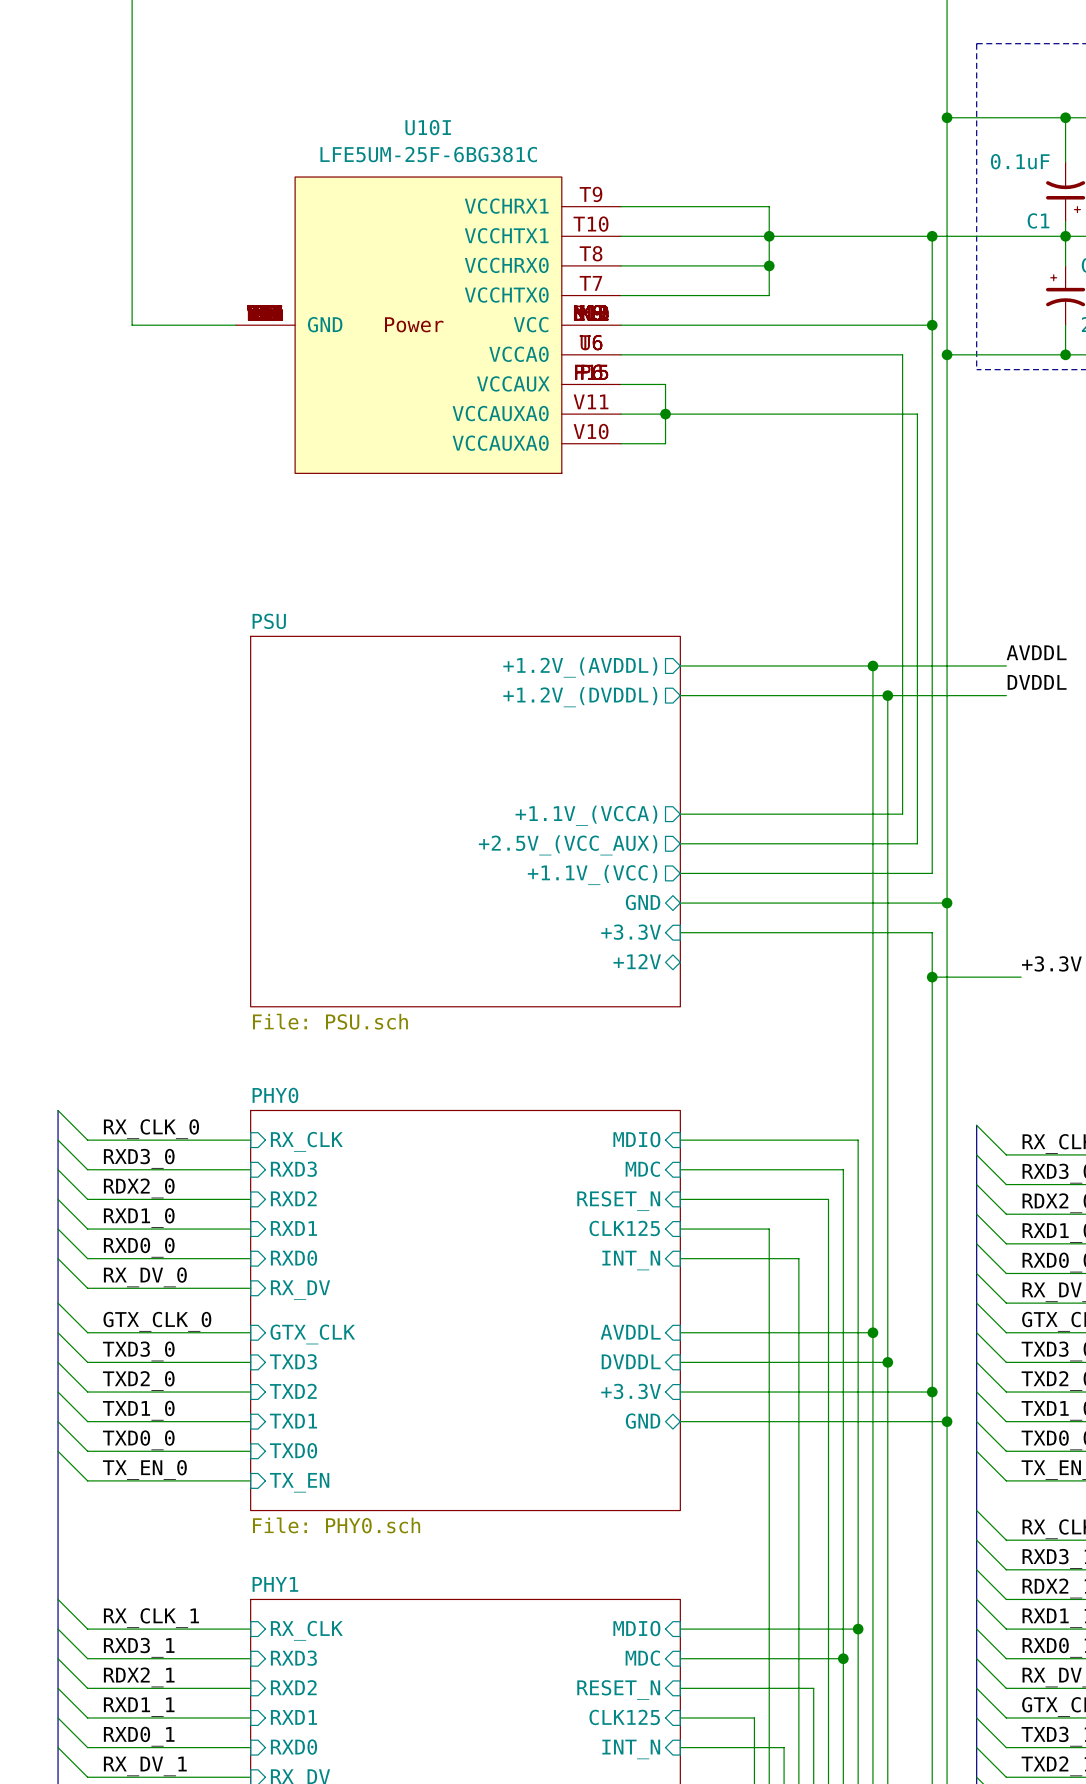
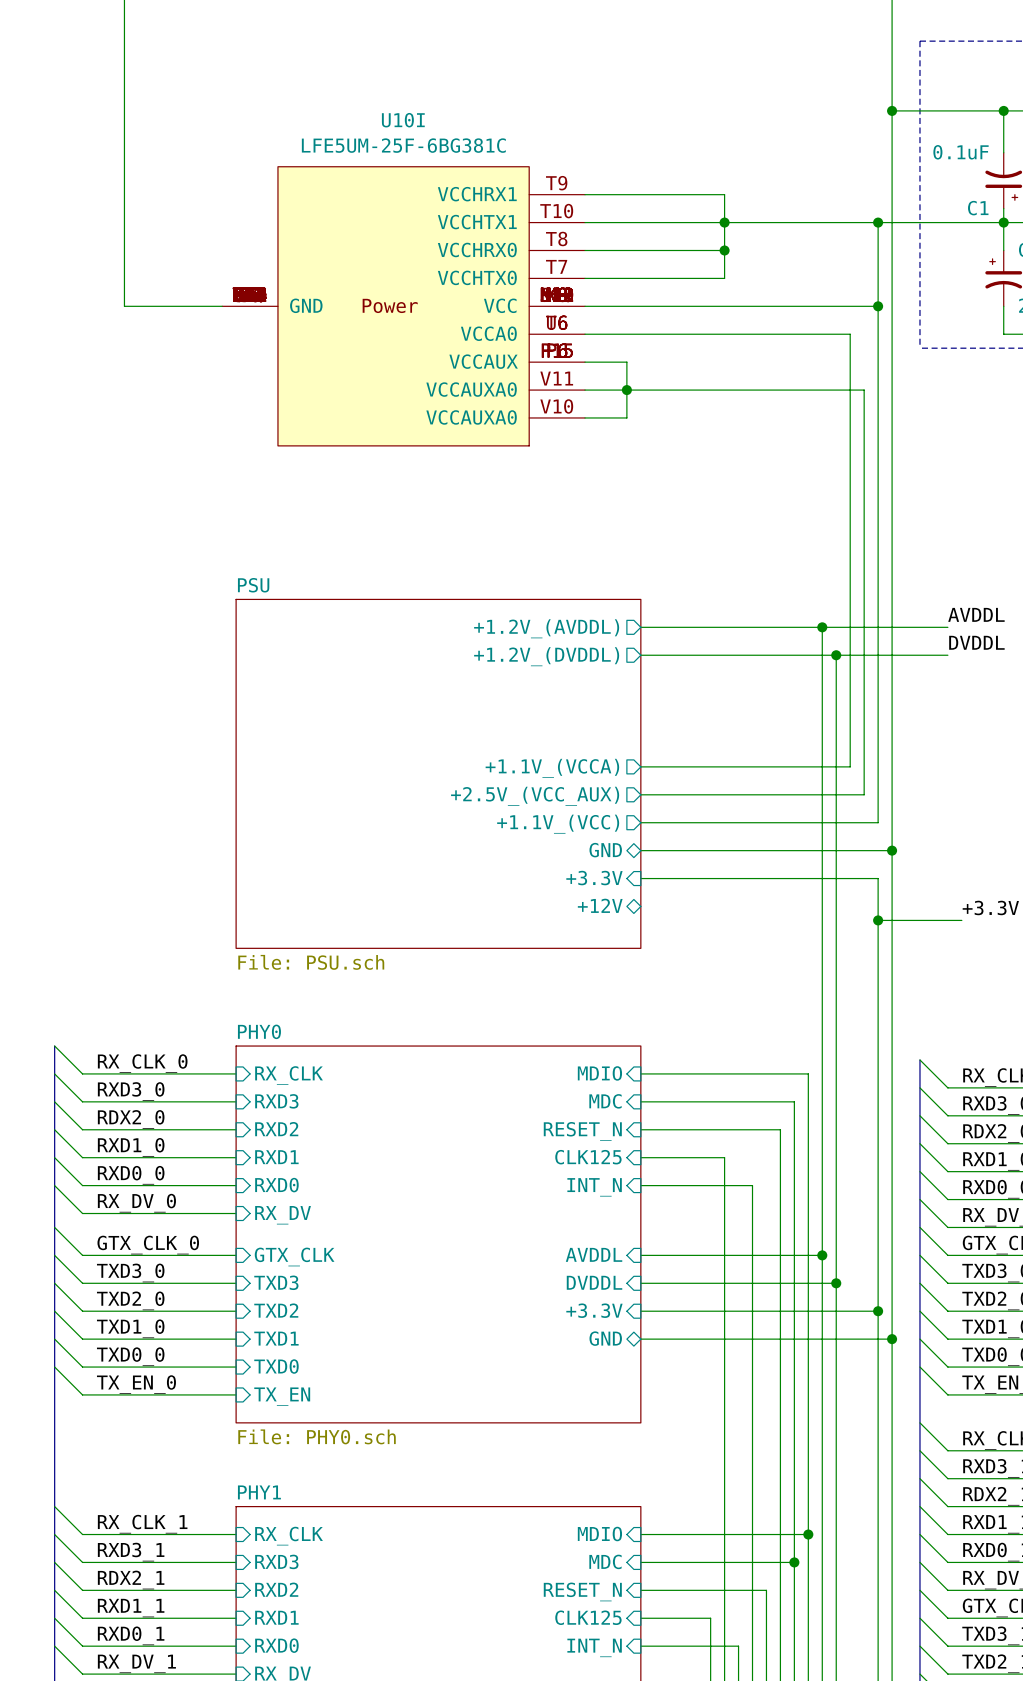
wire: (947, 354) (1065, 354) -> none
junction: (947, 354) -> none
junction: (1065, 354) -> none

